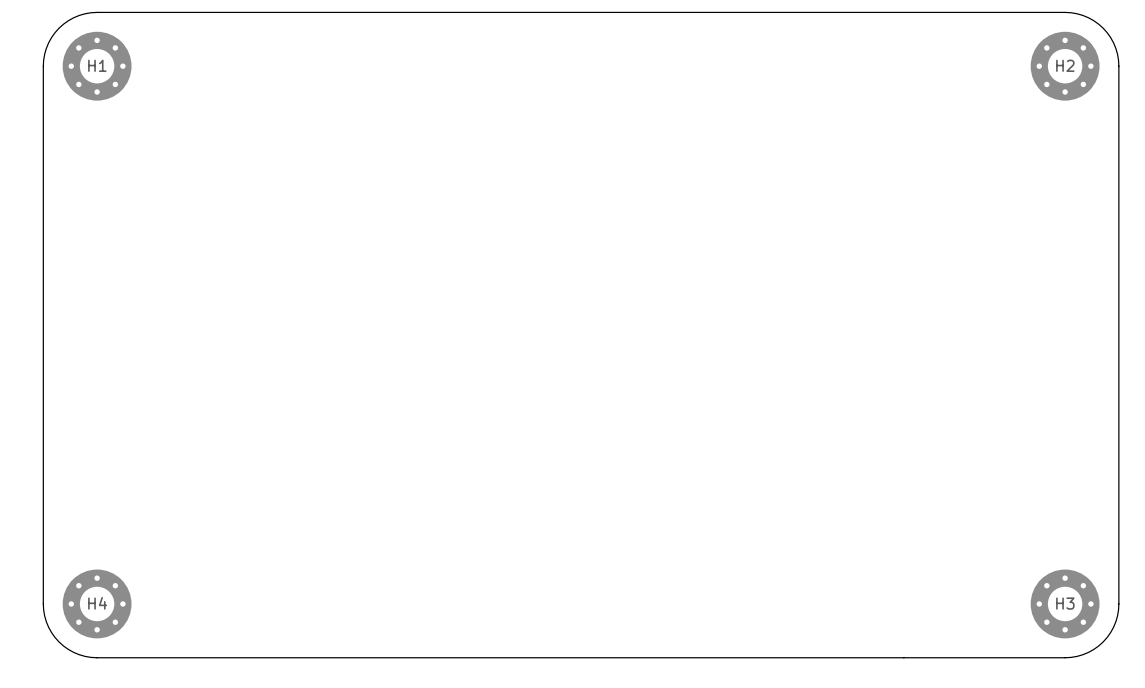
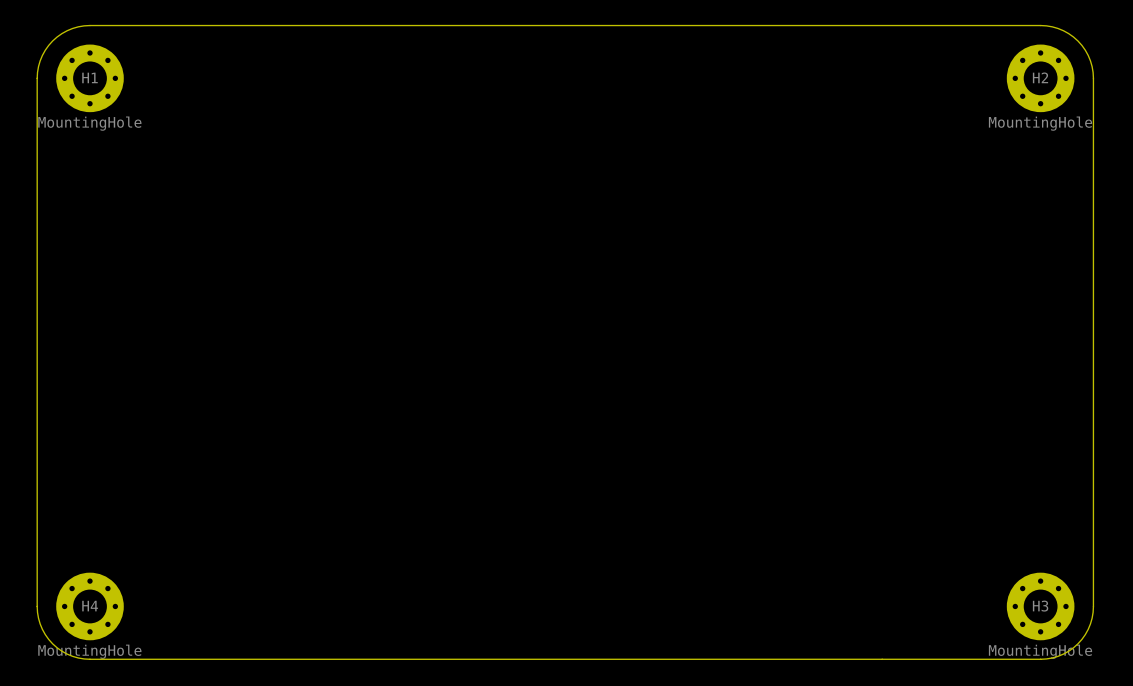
H1 value: none -> MountingHole (89, 123)
H2 value: none -> MountingHole (1040, 123)
H4 value: none -> MountingHole (89, 651)
H3 value: none -> MountingHole (1040, 651)

